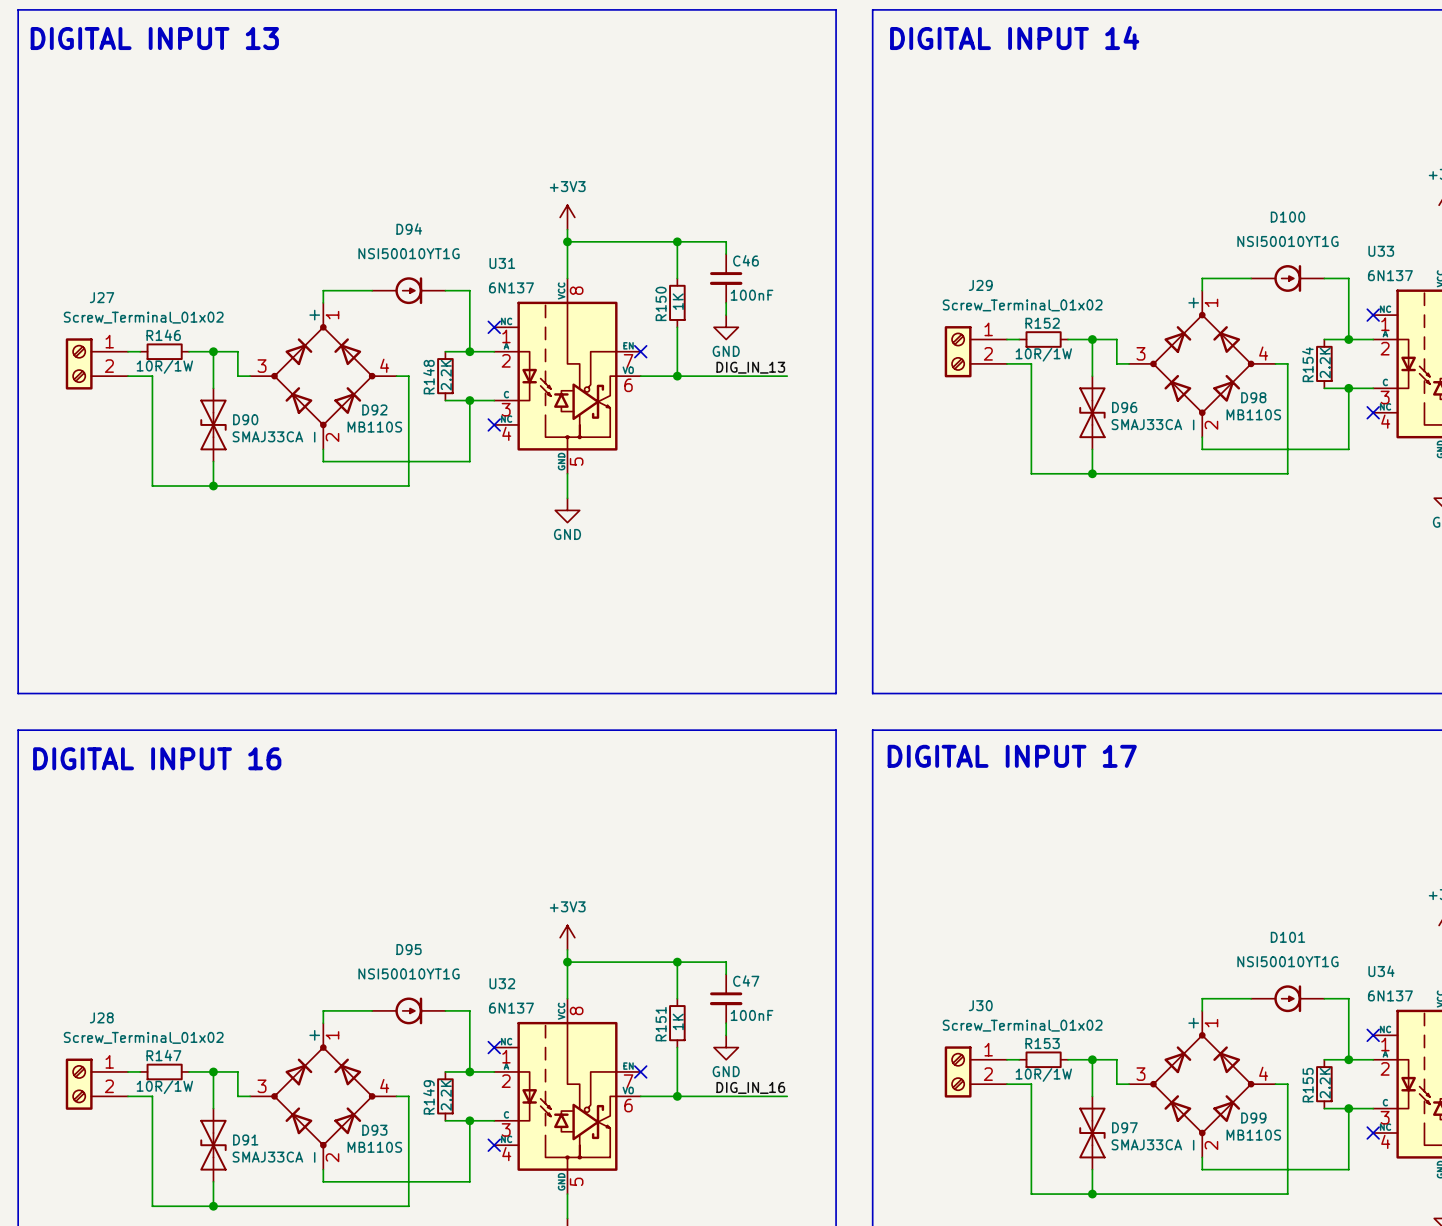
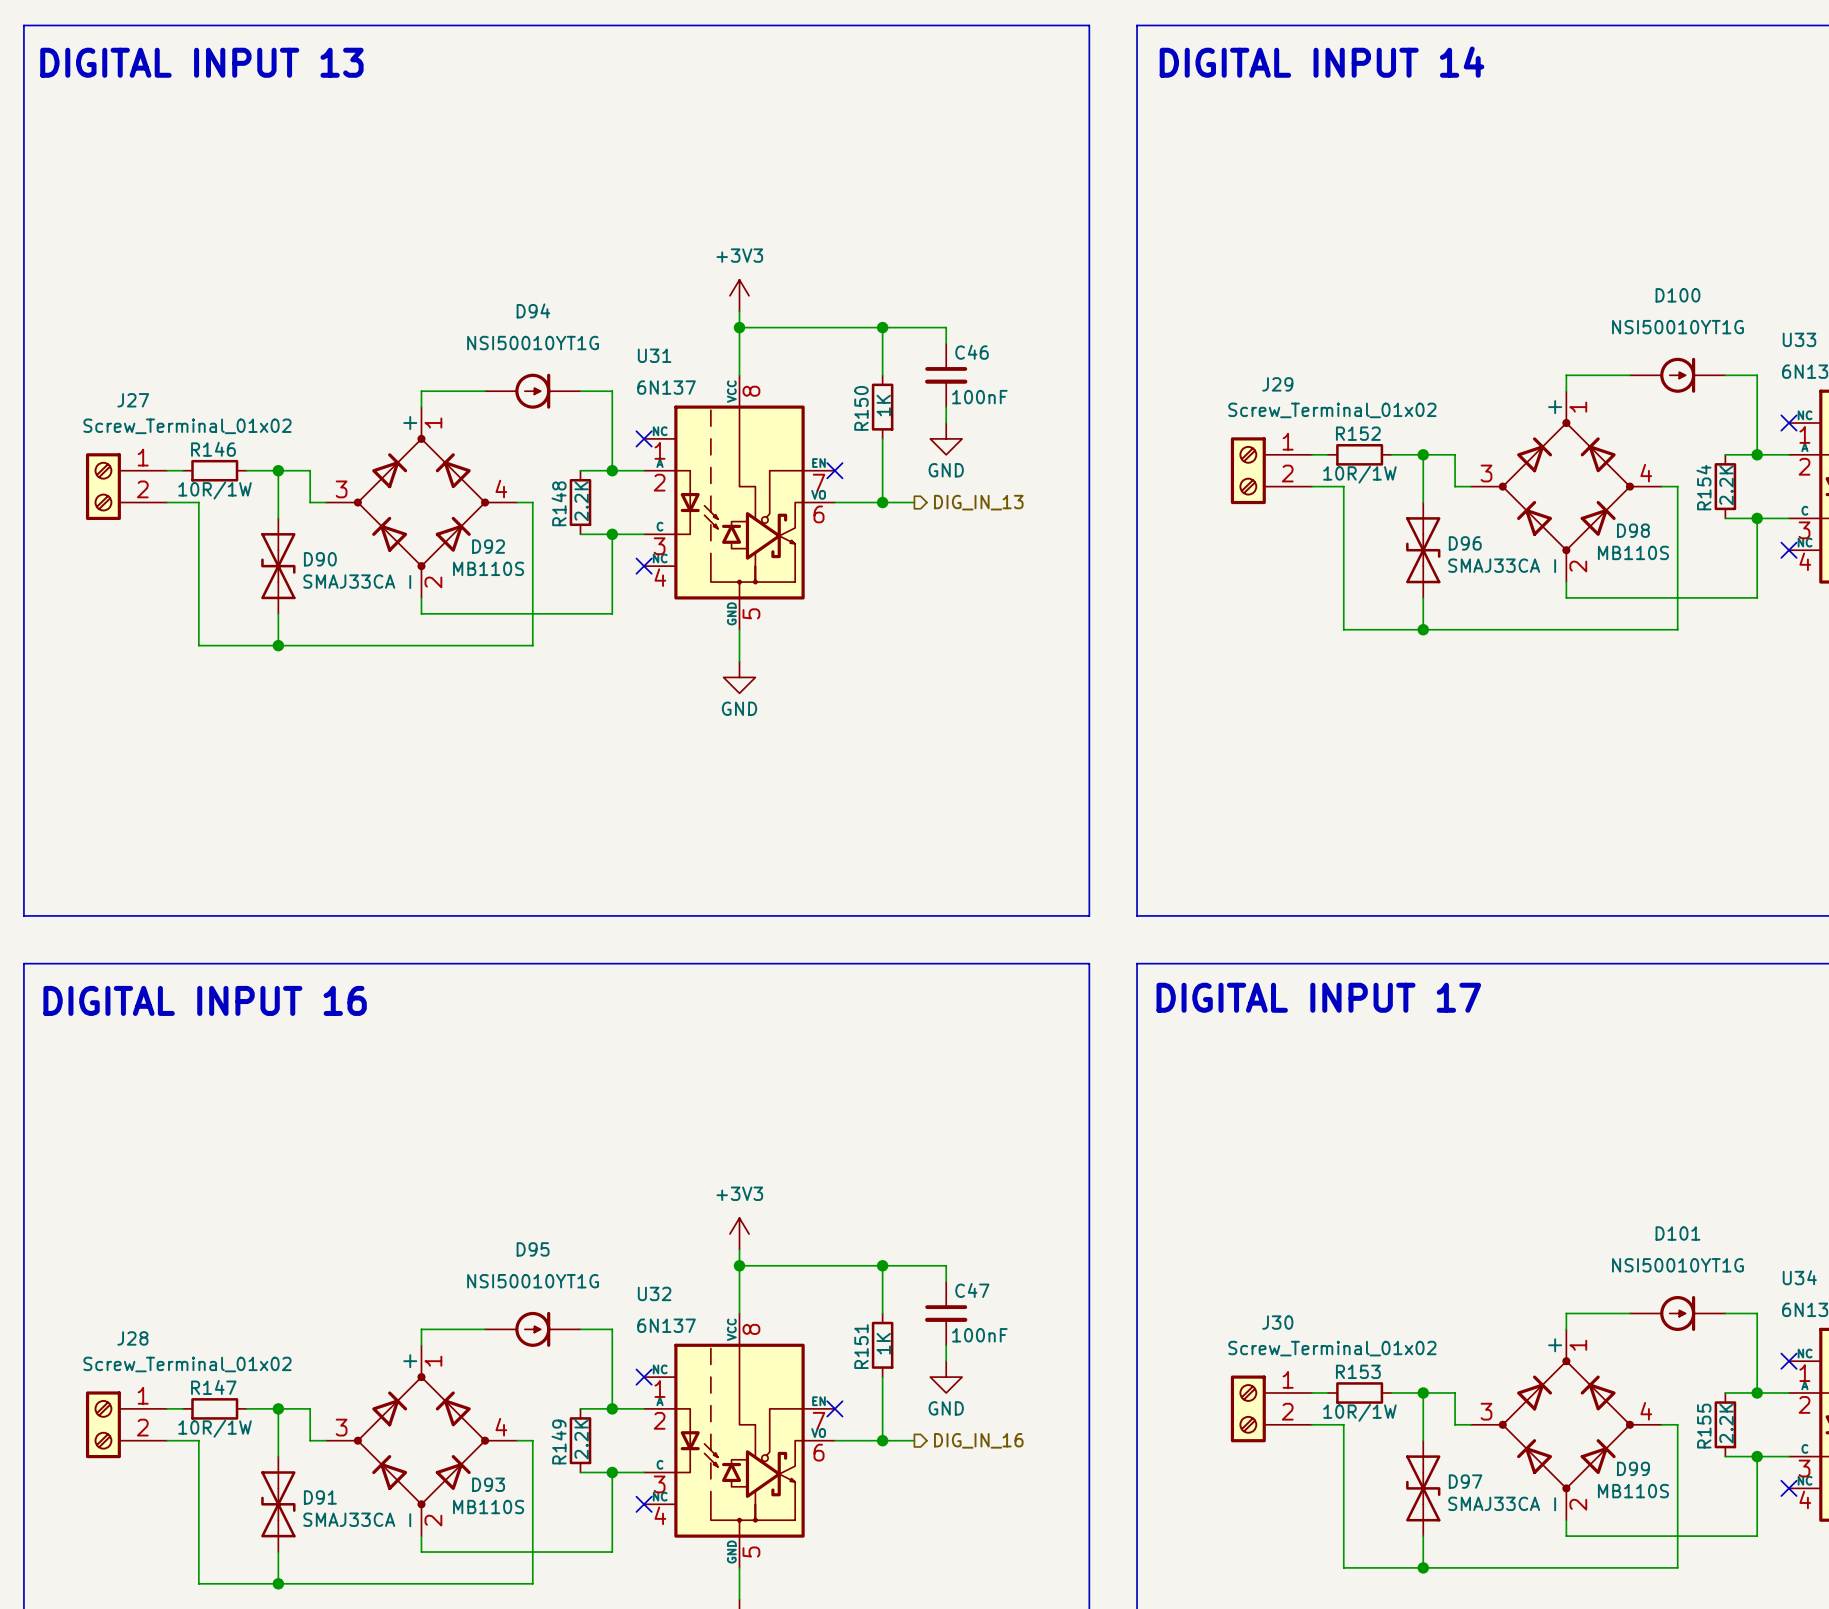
label: DIG_IN_13 (750, 367) -> none
wire: (701, 376) (787, 376) -> none
hierarchical label: none -> DIG_IN_13 (978, 502)
label: DIG_IN_16 (750, 1087) -> none
wire: (701, 1096) (787, 1096) -> none
hierarchical label: none -> DIG_IN_16 (978, 1440)

